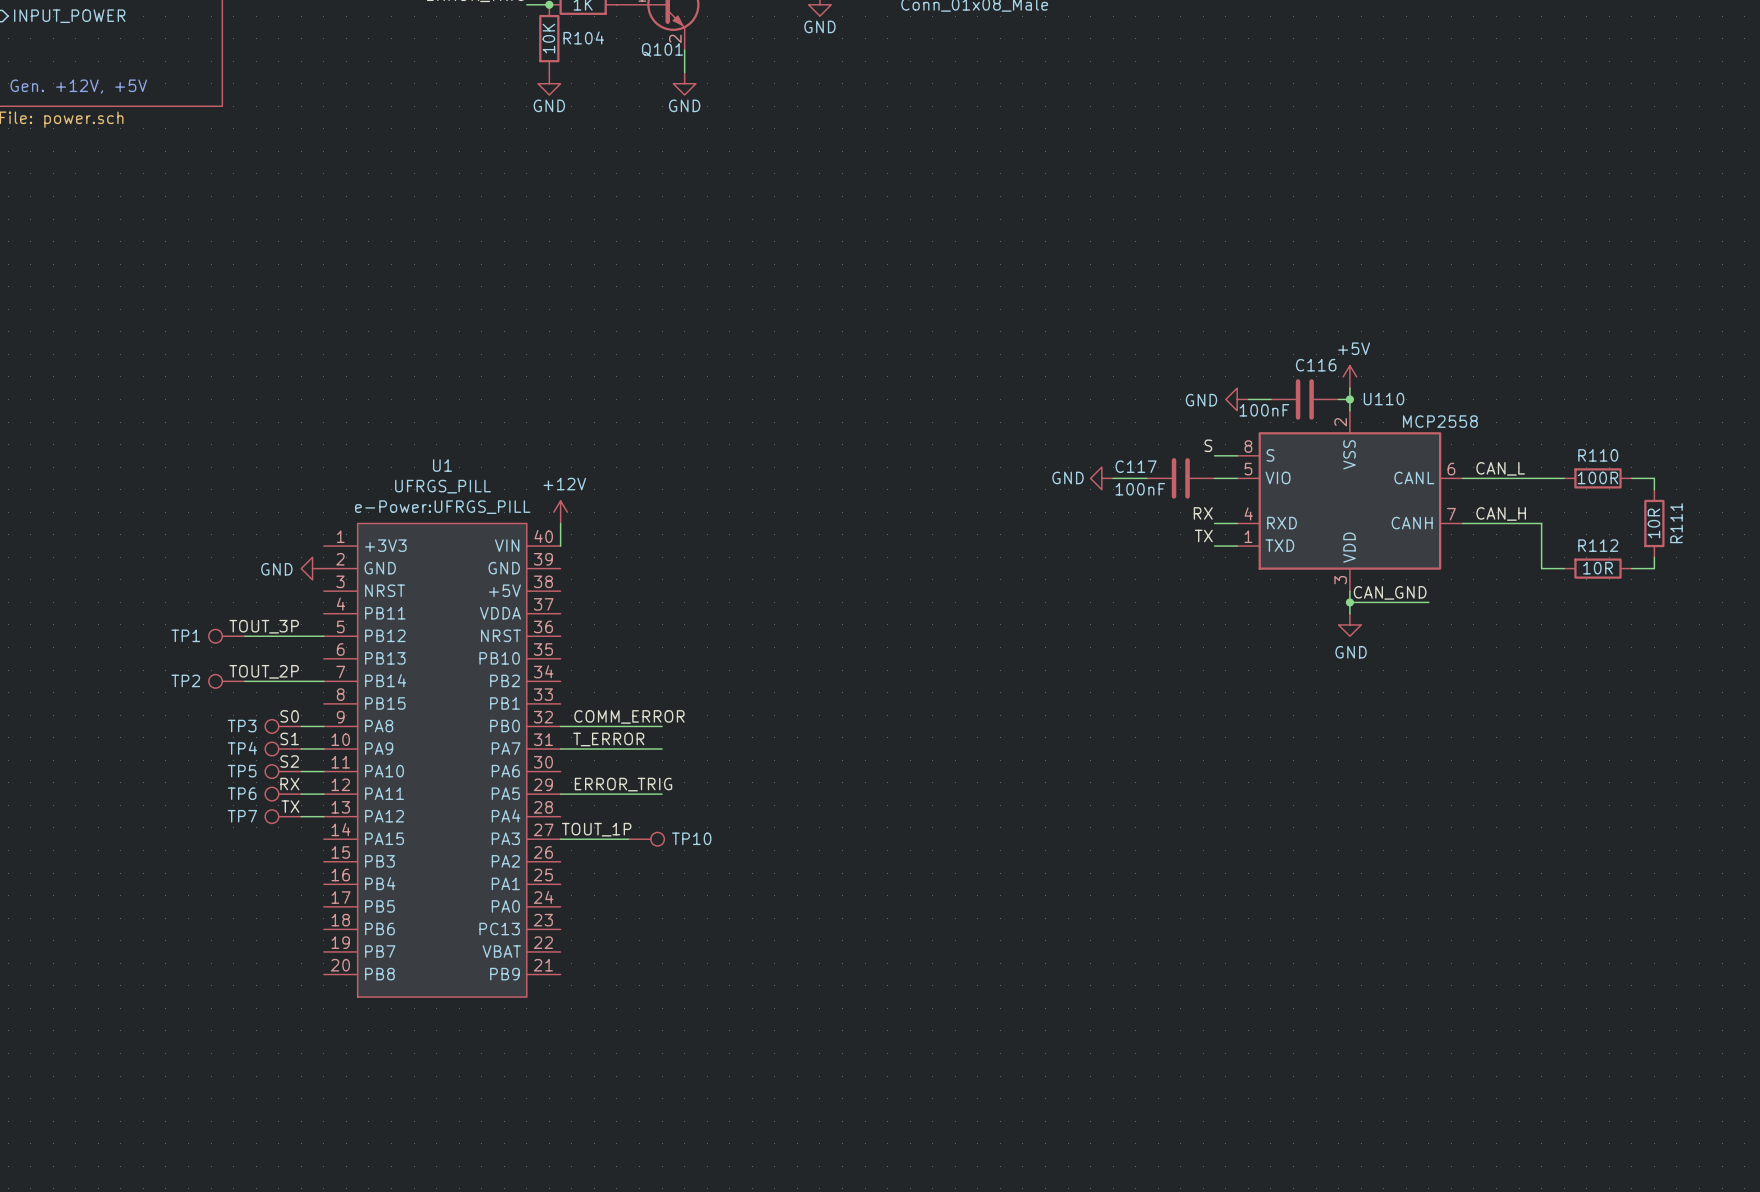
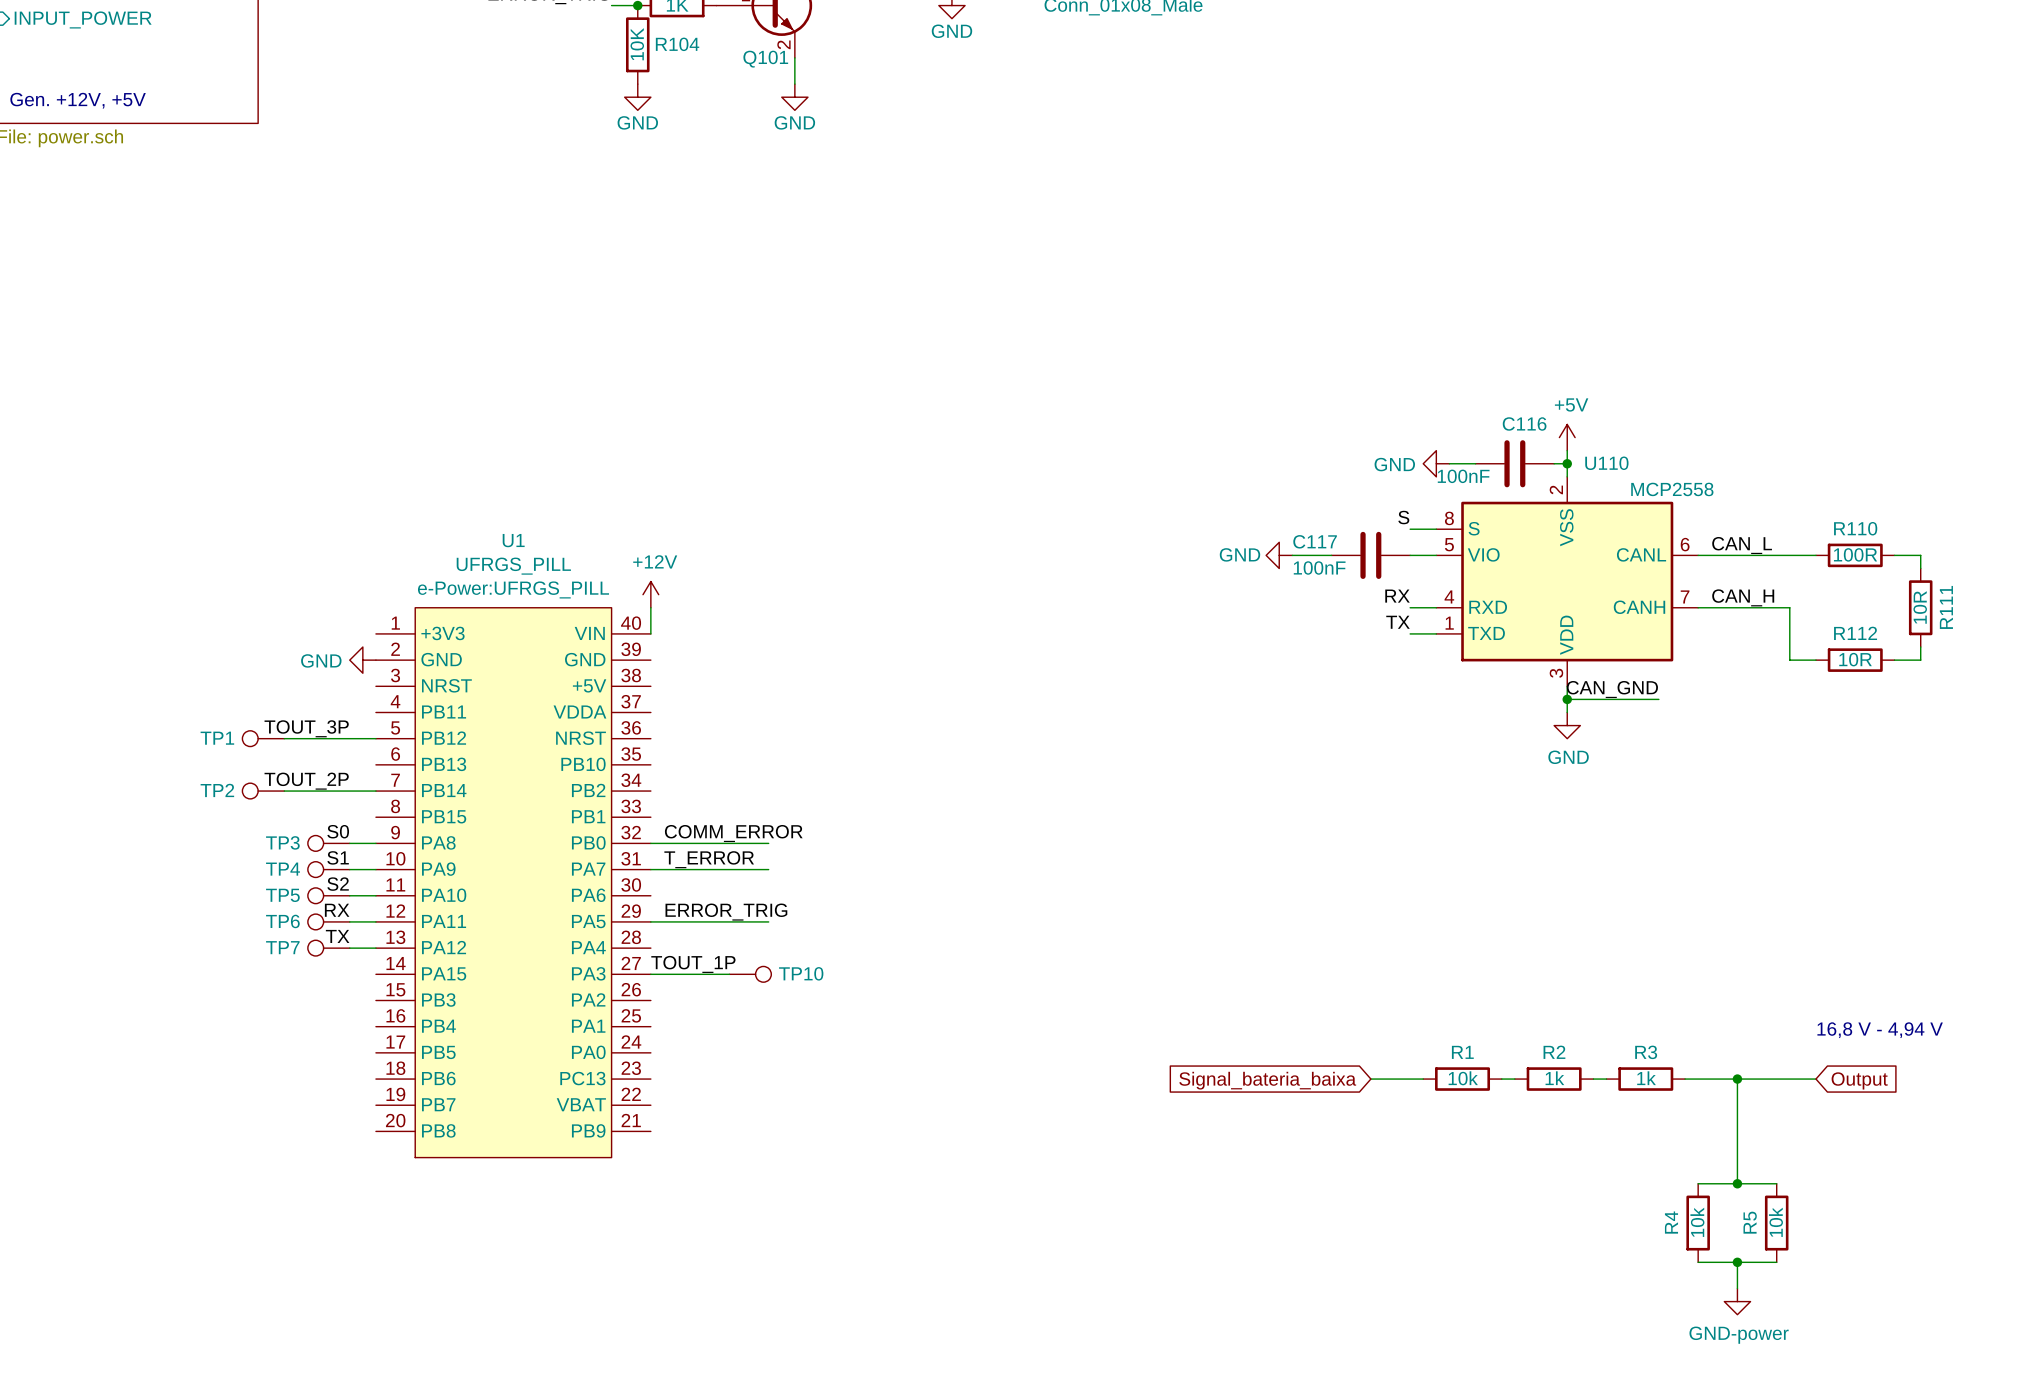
text: none -> 16,8 V - 4,94 V (1880, 1030)
wire: none -> (1370, 1079) (1423, 1079)
R1: none -> 10k (1462, 1079)
wire: none -> (1501, 1079) (1514, 1079)
R2: none -> 1k (1554, 1079)
wire: none -> (1593, 1079) (1606, 1079)
R3: none -> 1k (1645, 1079)
wire: none -> (1685, 1079) (1815, 1079)
wire: none -> (1737, 1079) (1737, 1183)
junction: none -> (1737, 1079)
global label: none -> Signal_bateria_baixa (1267, 1080)
global label: none -> Output (1859, 1080)
wire: none -> (1698, 1183) (1776, 1183)
junction: none -> (1737, 1183)
R4: none -> 10k (1698, 1223)
R5: none -> 10k (1776, 1223)
wire: none -> (1698, 1262) (1776, 1262)
wire: none -> (1737, 1262) (1737, 1288)
junction: none -> (1737, 1262)
power symbol: none -> GND-power (1737, 1301)

